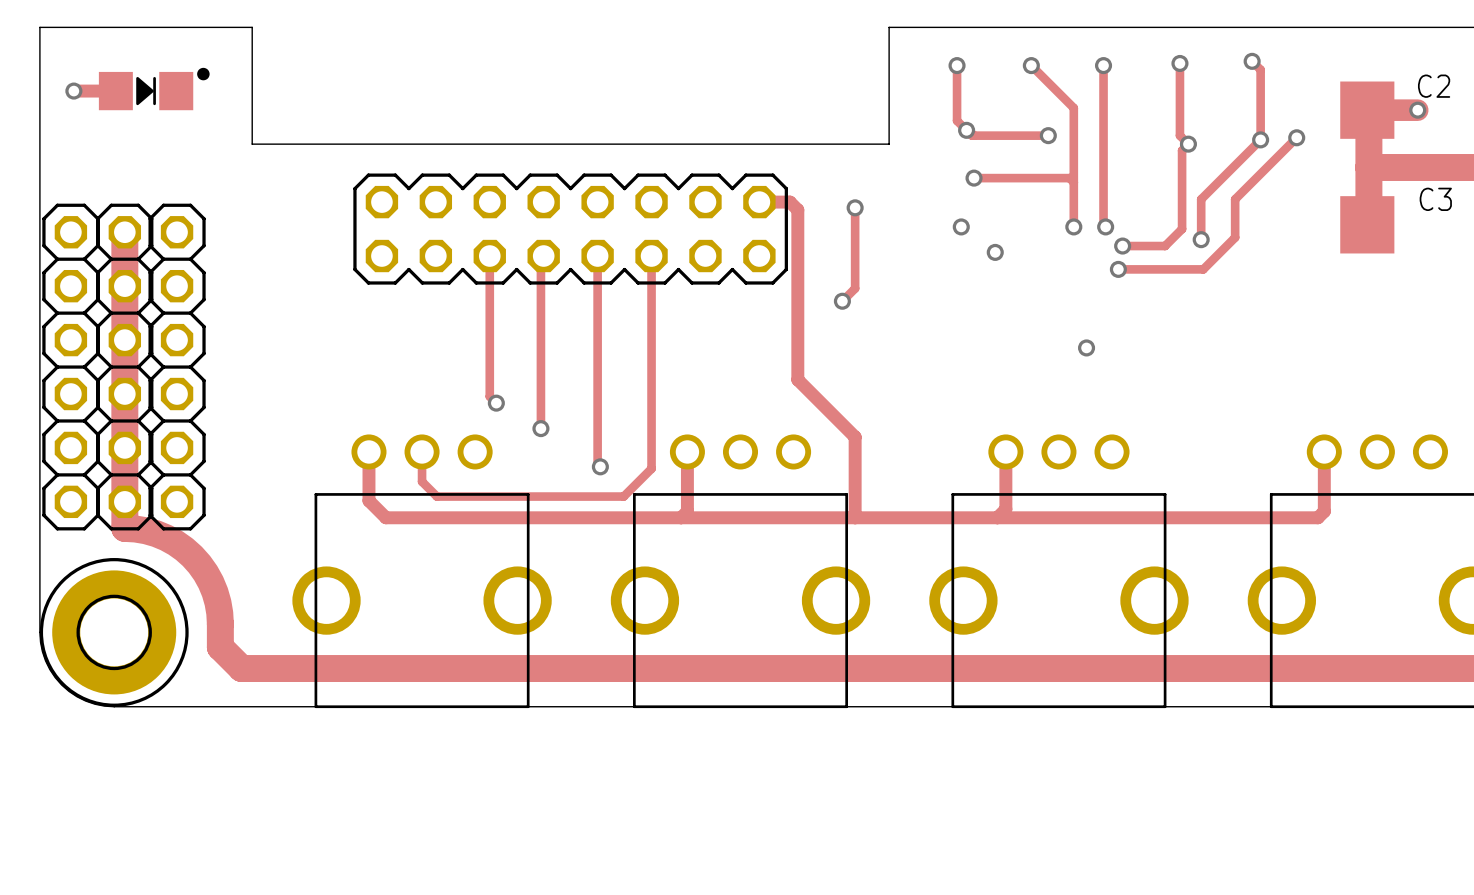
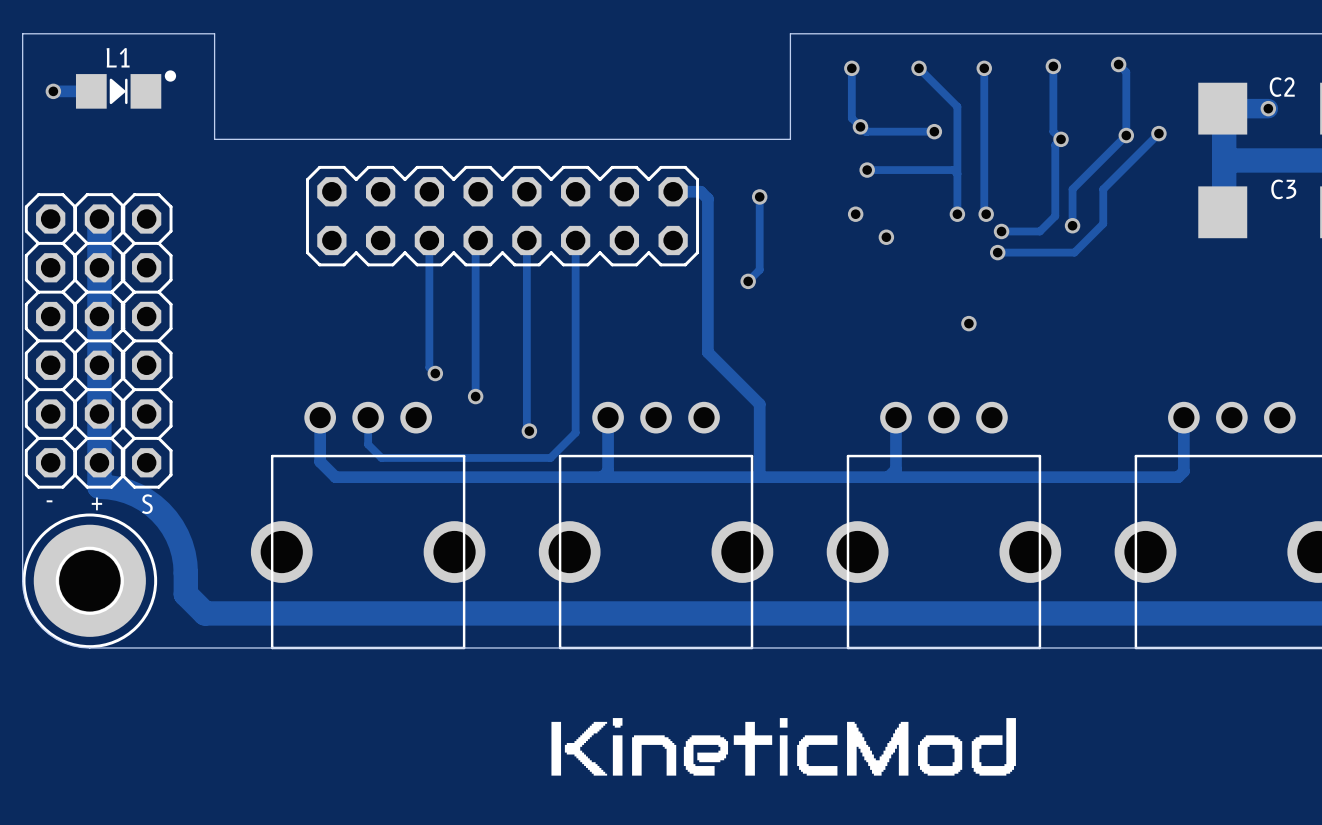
L1 name: none -> L1 (118, 57)
text: none -> - (49, 501)
text: none -> + (96, 503)
text: none -> S (147, 504)
drawing: none -> [551, 718, 1016, 776]

